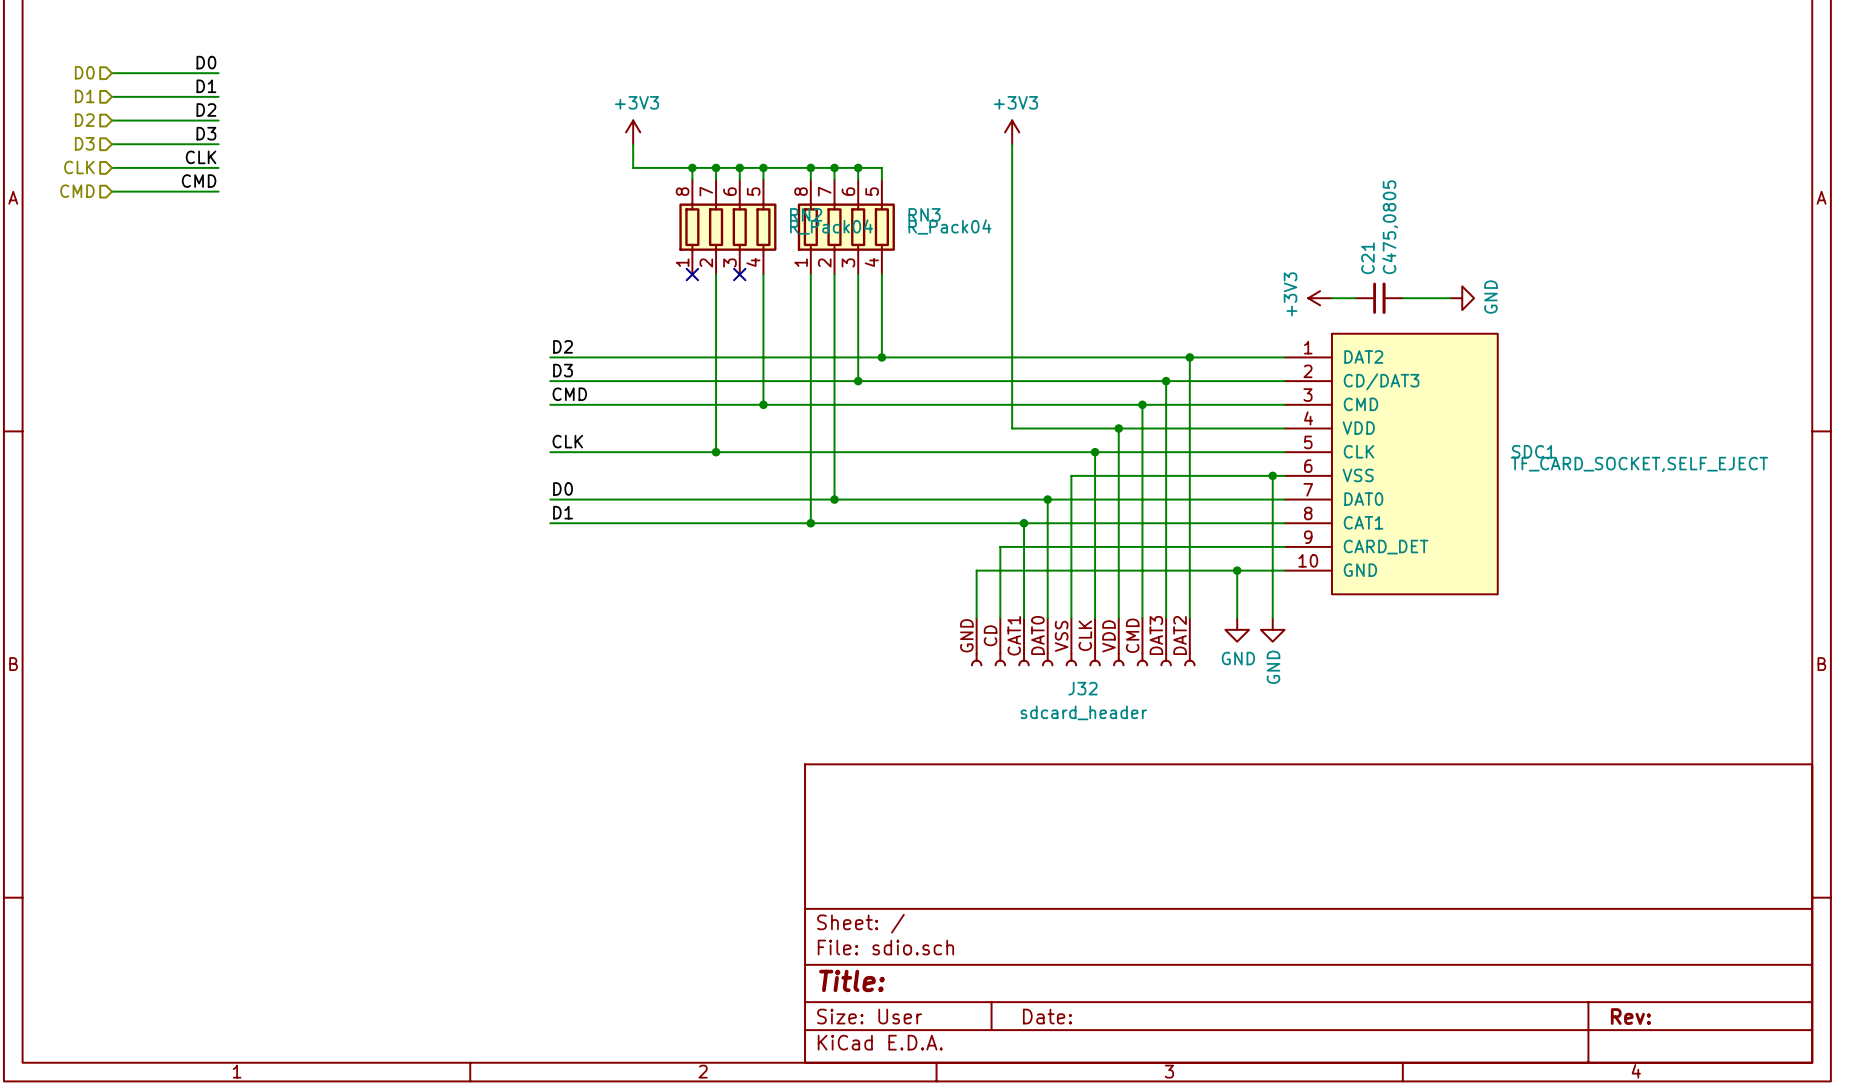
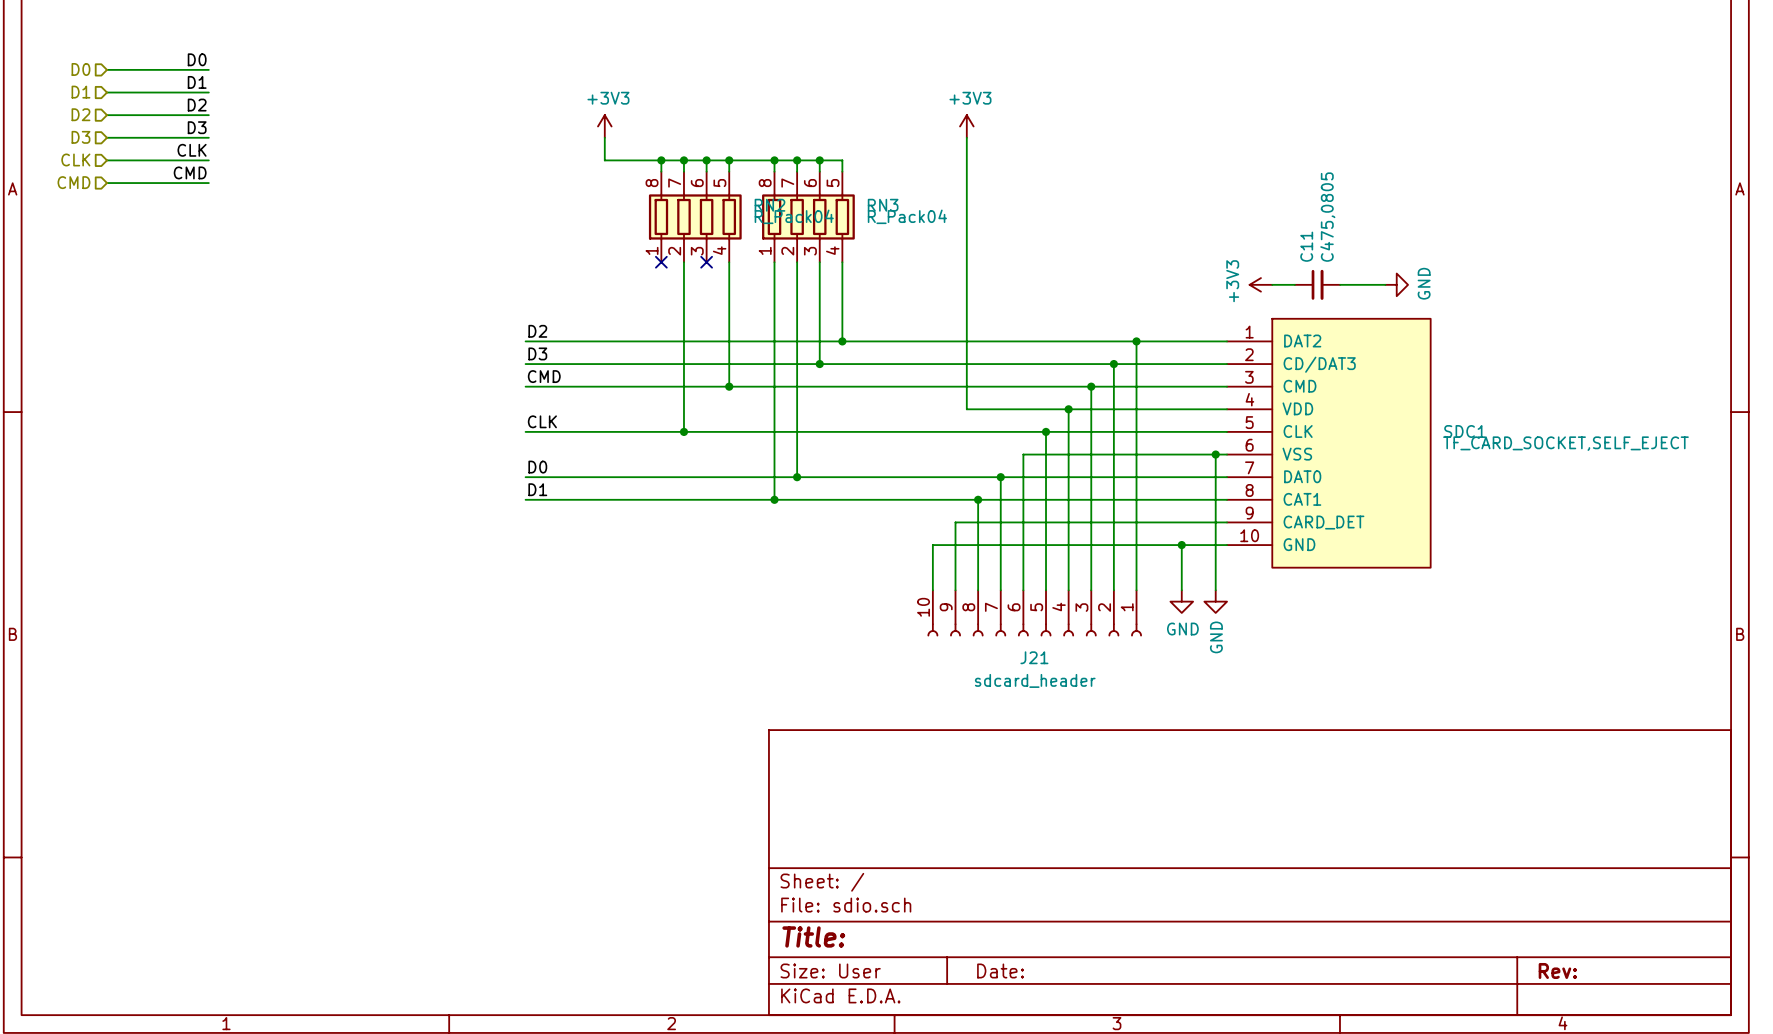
C21 name: C21 (1367, 258) -> C11 (1306, 246)
J32 symbol: [971, 618, 1196, 667] -> [927, 590, 1142, 637]
J32 name: J32 (1082, 688) -> J21 (1034, 657)

